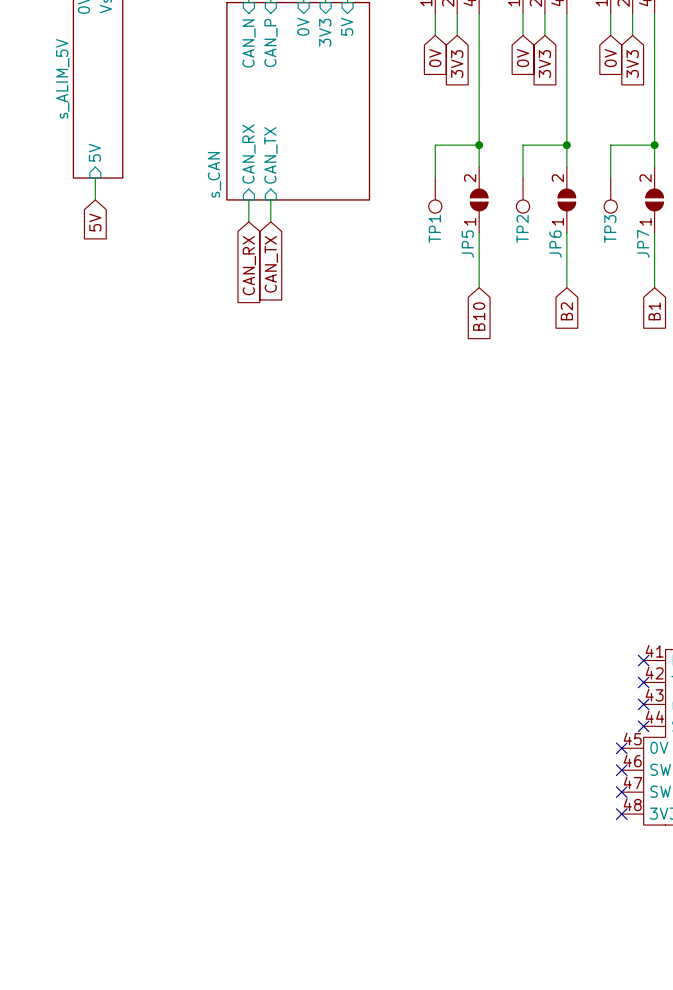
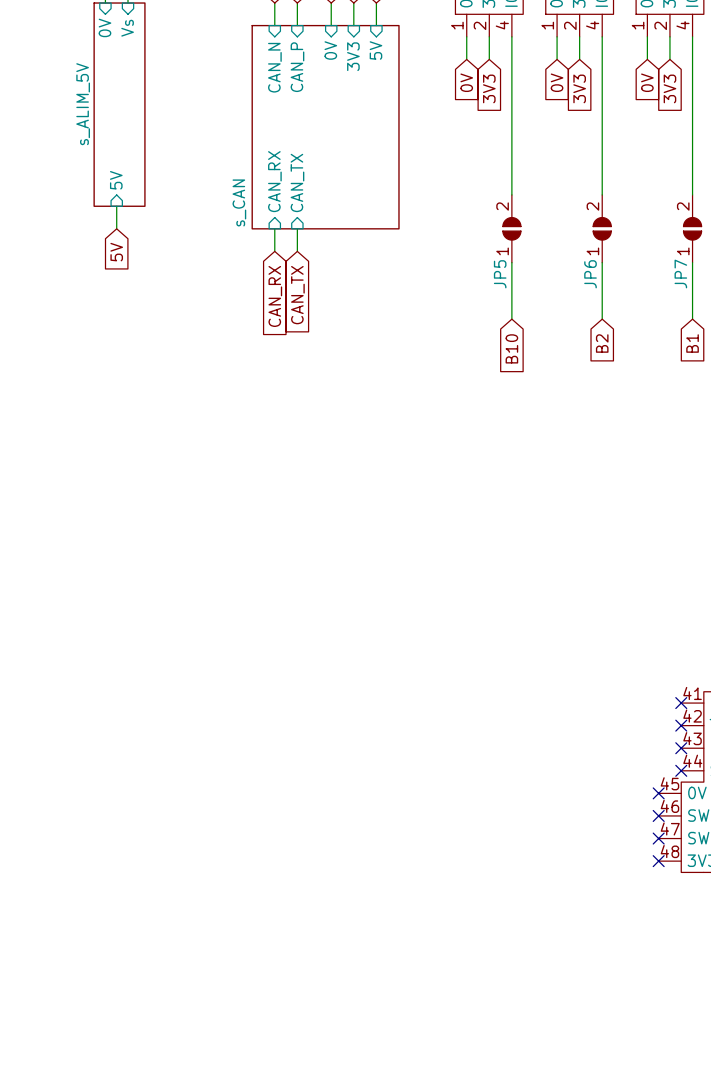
wire: (479, 145) (435, 145) (435, 178) -> none
junction: (479, 145) -> none
wire: (566, 145) (523, 145) (523, 178) -> none
junction: (566, 145) -> none
wire: (654, 145) (610, 145) (610, 178) -> none
junction: (654, 145) -> none
TP1: (435, 195) -> none
TP2: (523, 195) -> none
TP3: (610, 195) -> none

